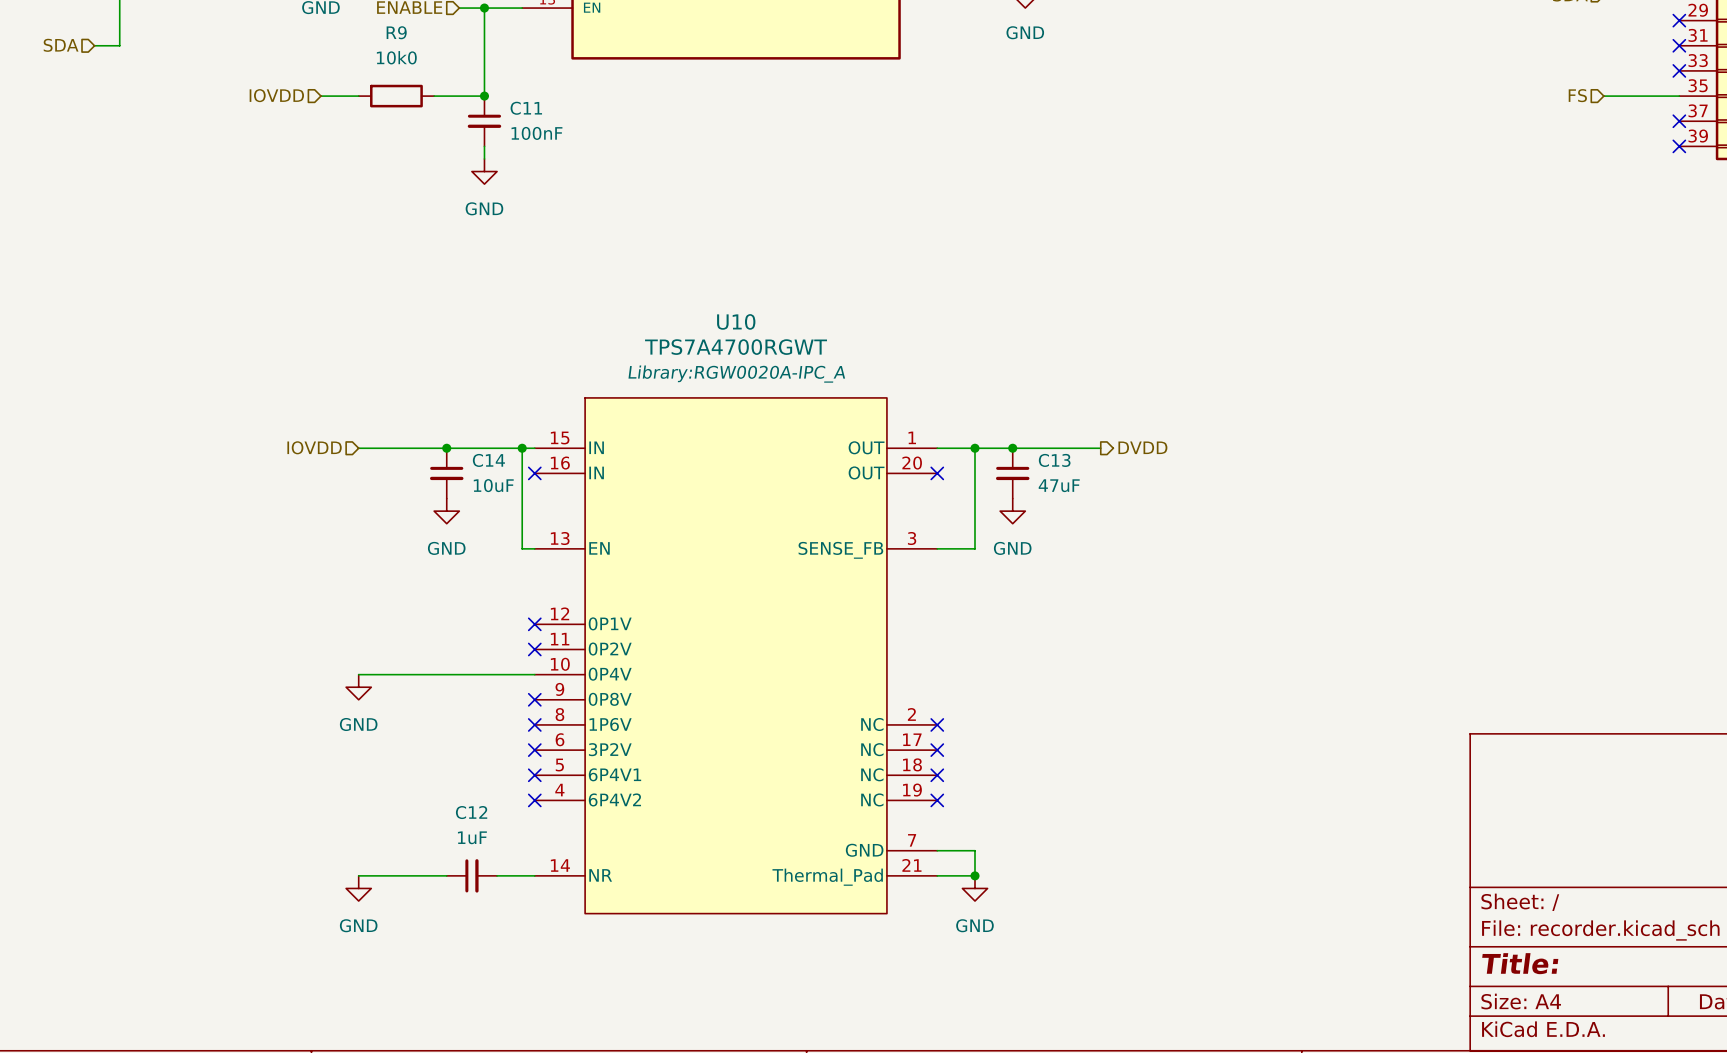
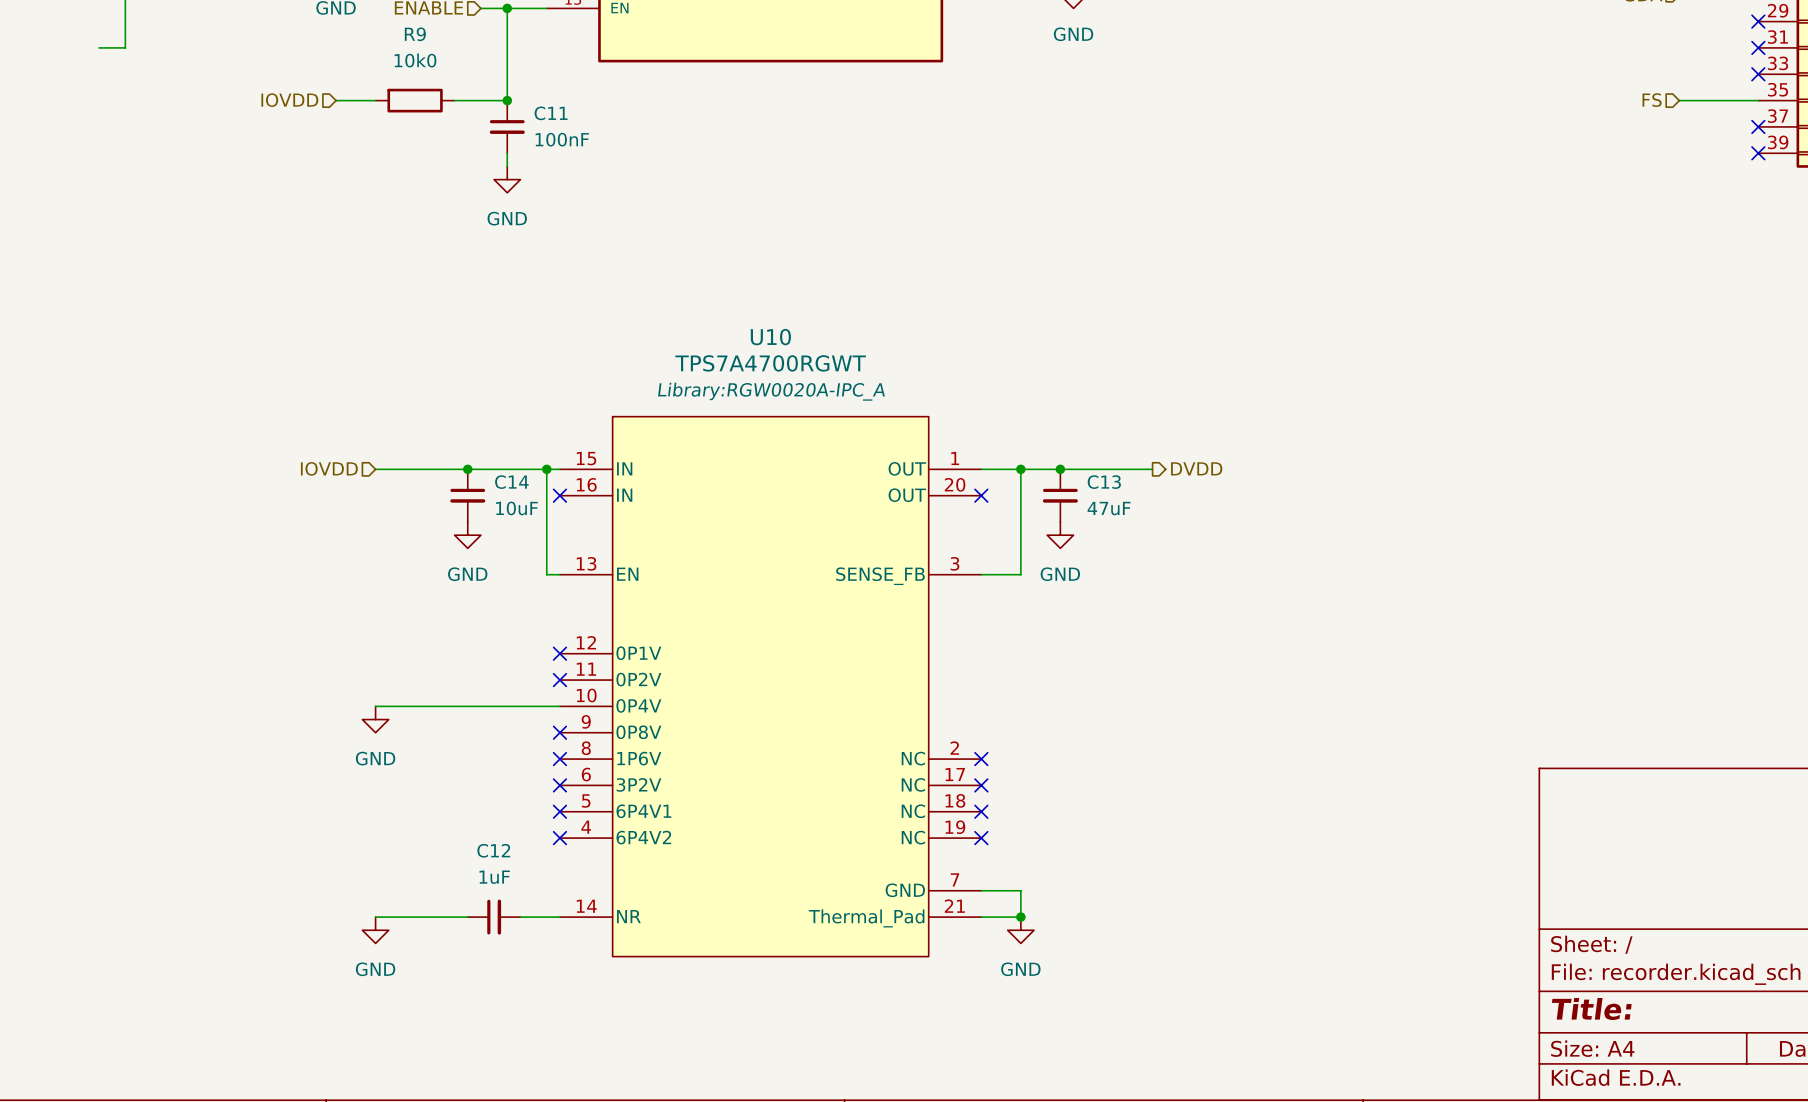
hierarchical label: SDA (61, 45) -> none

